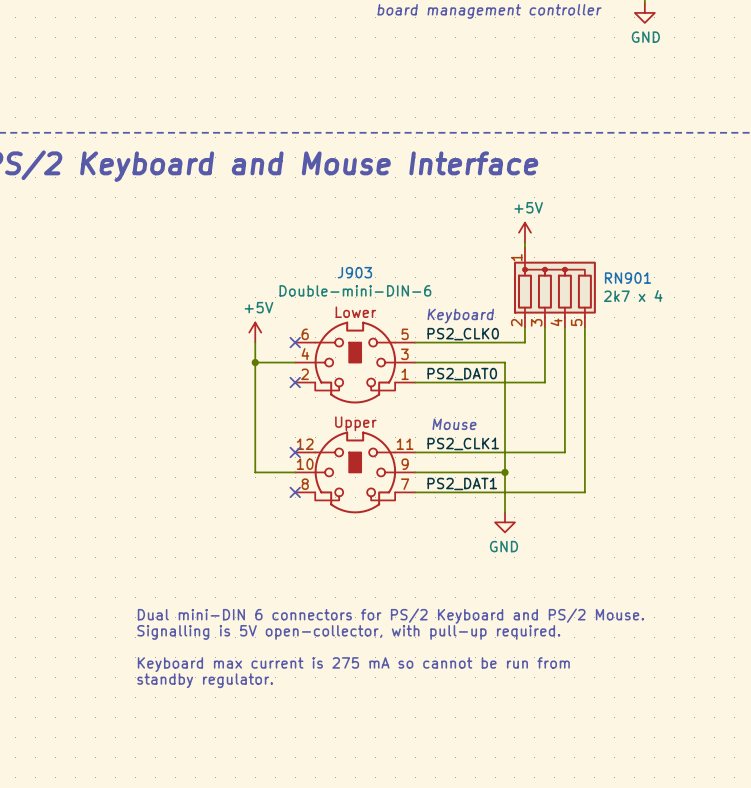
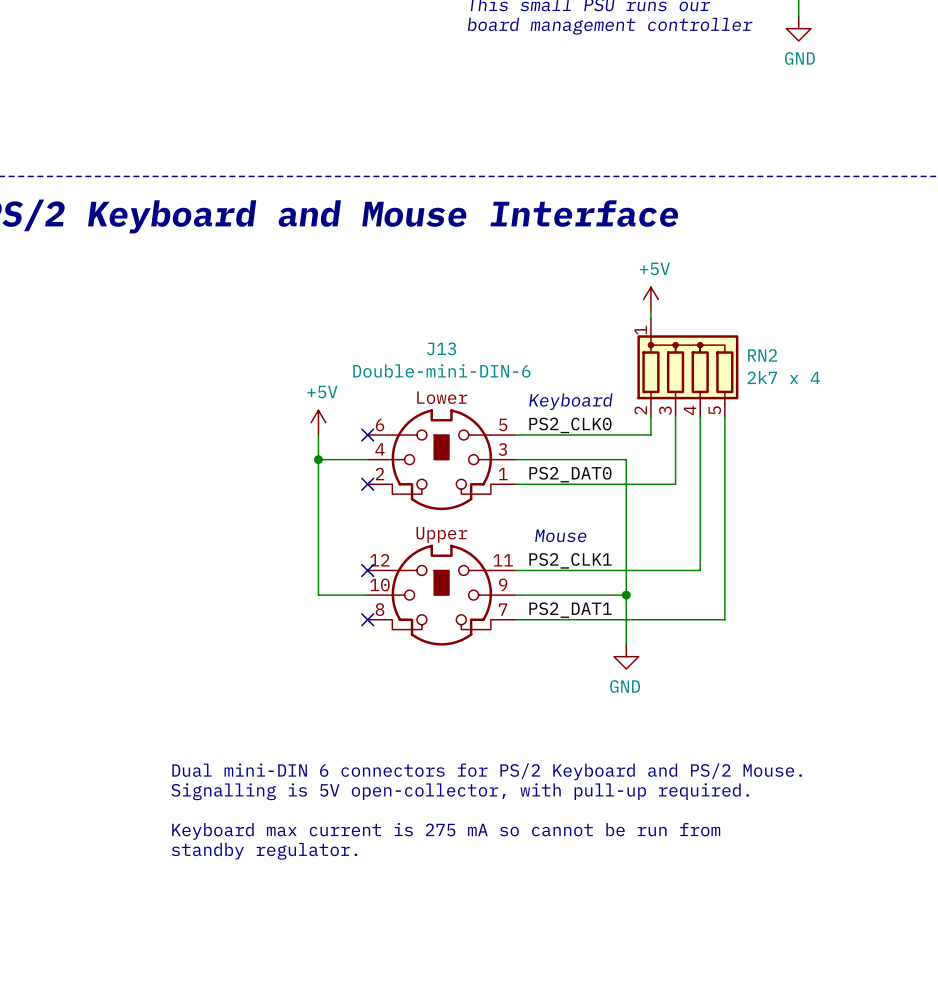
J903 name: J903 (354, 272) -> J13 (441, 348)
RN901 name: RN901 (628, 278) -> RN2 (762, 355)

